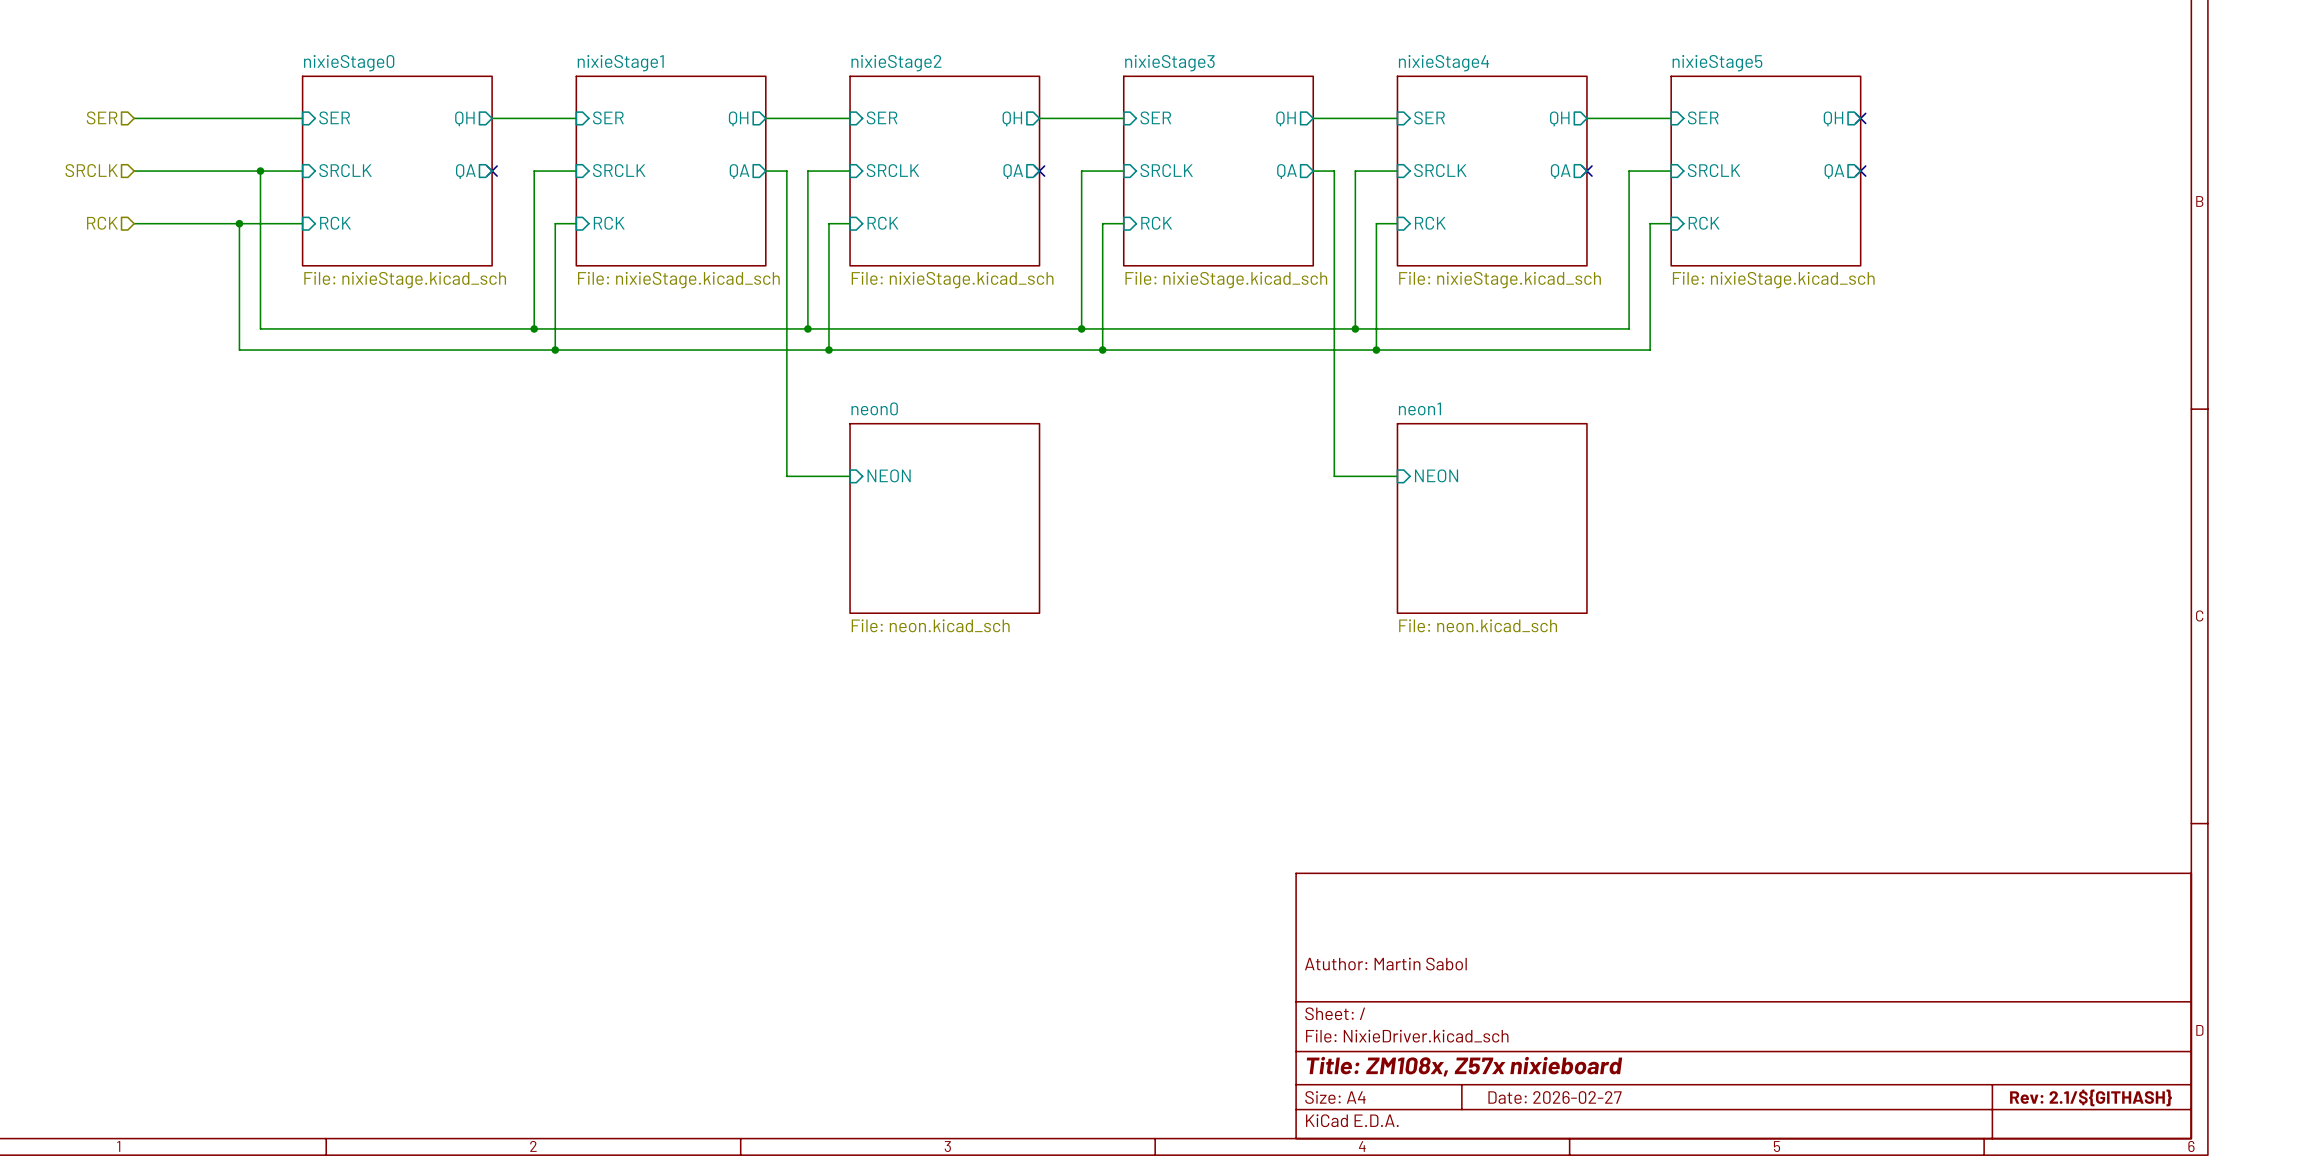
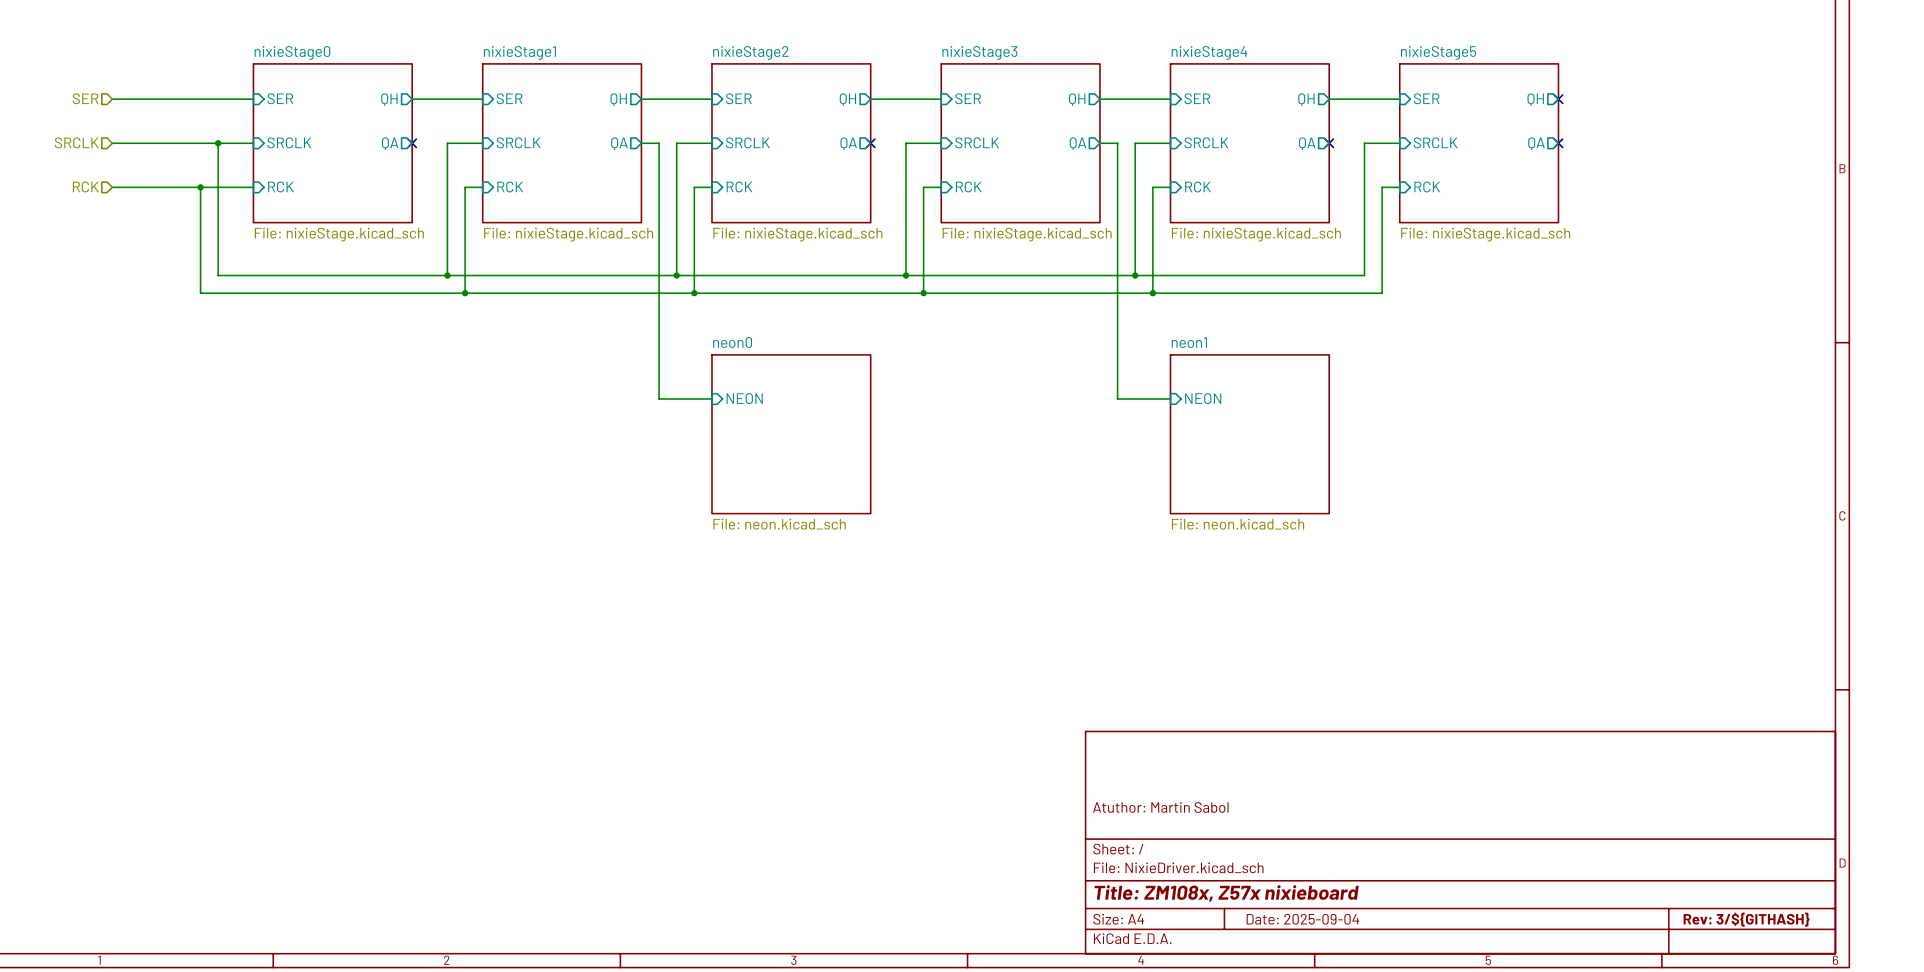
title block: Date: 2026-02-27 (1555, 1097) -> Date: 2025-09-04 (1302, 919)
title block: Rev: 2.1/${GITHASH} (2090, 1097) -> Rev: 3/${GITHASH} (1746, 919)

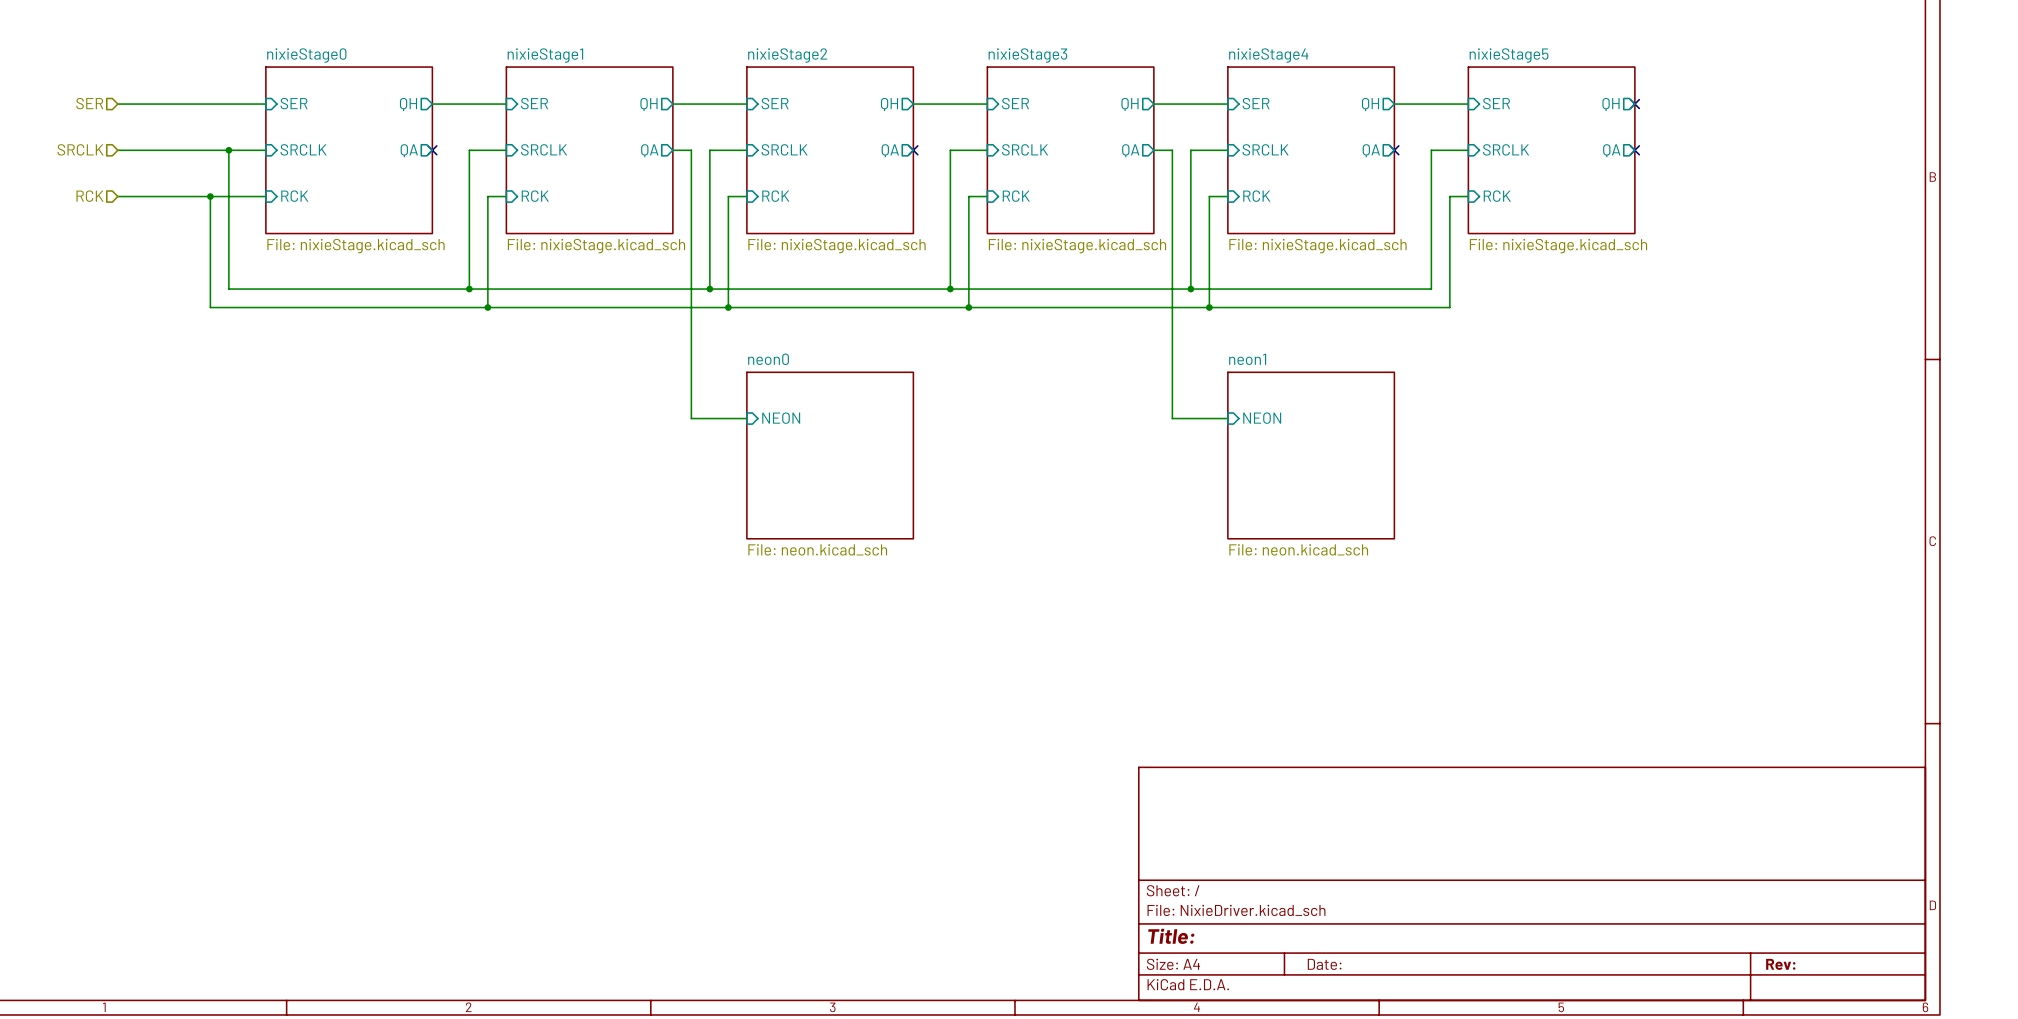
title block: Atuthor: Martin Sabol (1160, 807) -> none
title block: Title: ZM108x, Z57x nixieboard (1226, 893) -> Title: (1171, 936)
title block: Date: 2025-09-04 (1302, 919) -> Date: (1324, 964)
title block: Rev: 3/${GITHASH} (1746, 919) -> Rev: (1780, 964)

